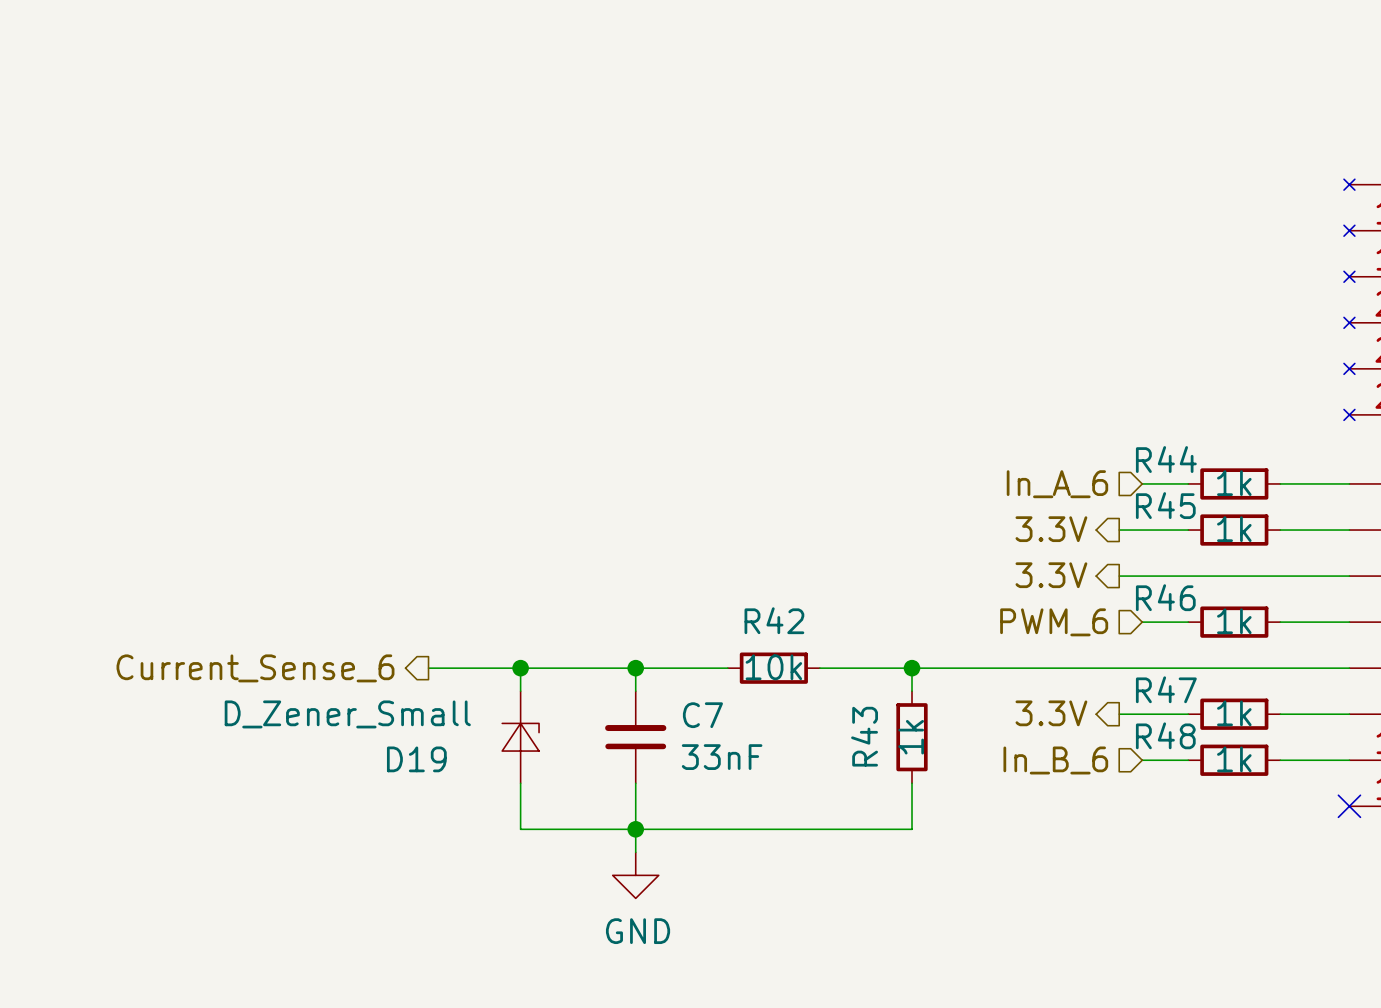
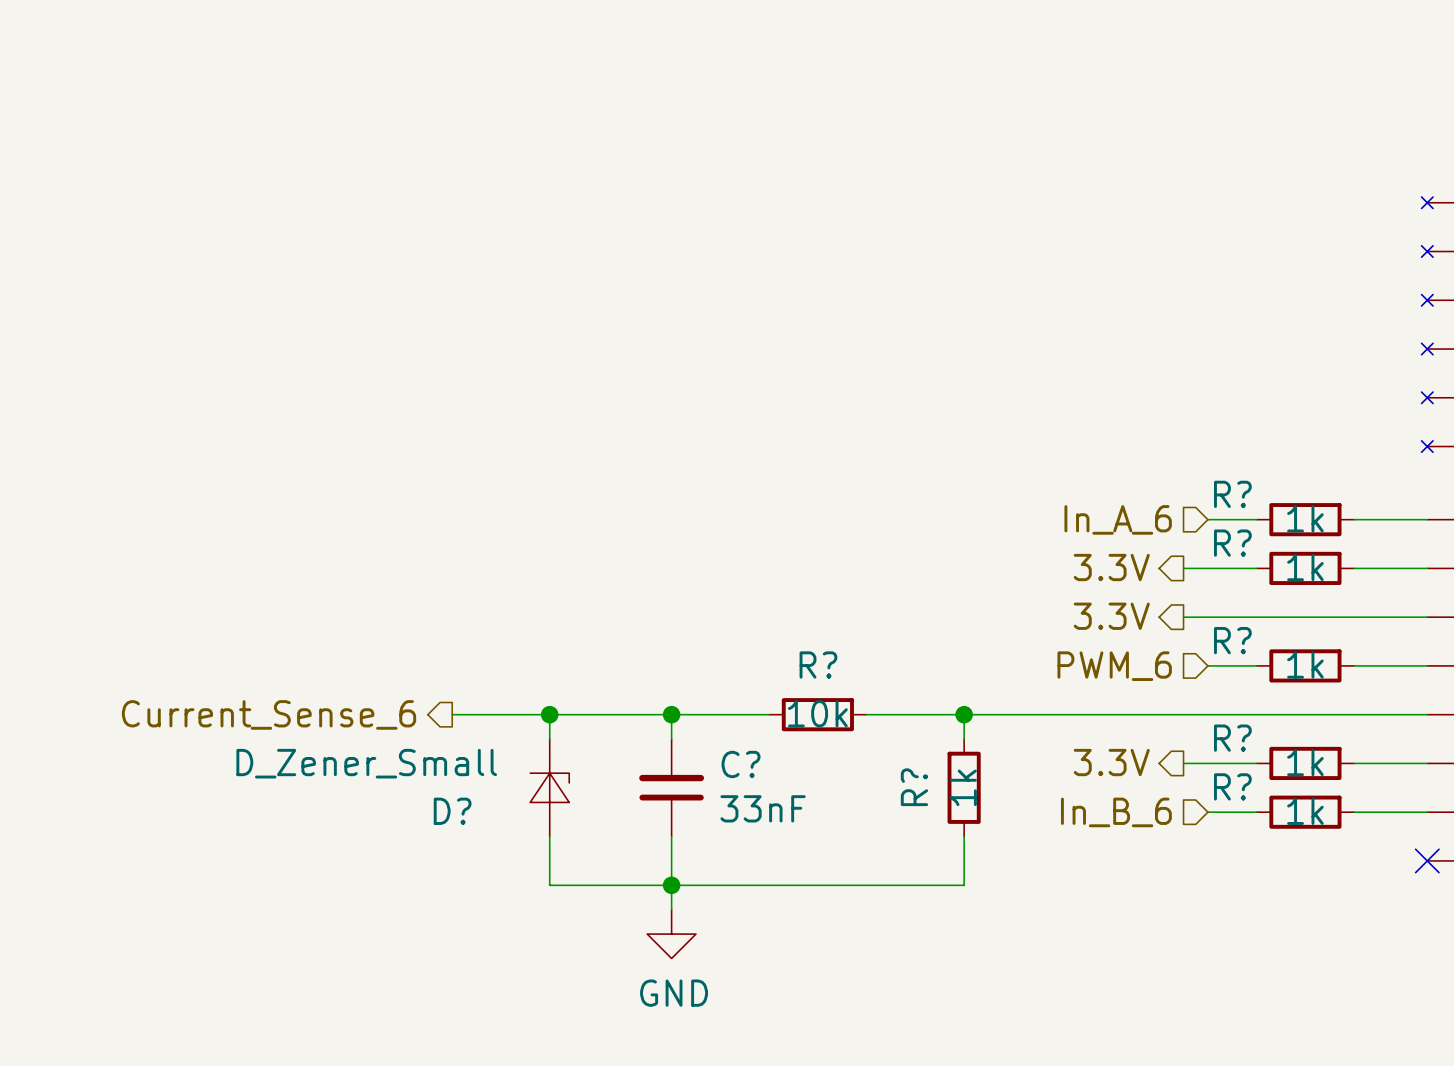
R44 name: R44 (1166, 459) -> R? (1232, 494)
R45 name: R45 (1165, 505) -> R? (1232, 543)
R46 name: R46 (1165, 597) -> R? (1232, 640)
R42 name: R42 (774, 620) -> R? (818, 665)
R47 name: R47 (1166, 689) -> R? (1232, 738)
C7 name: C7 (702, 715) -> C? (741, 764)
R48 name: R48 (1165, 735) -> R? (1232, 786)
R43 name: R43 (864, 736) -> R? (914, 787)
D19 name: D19 (416, 759) -> D? (452, 811)

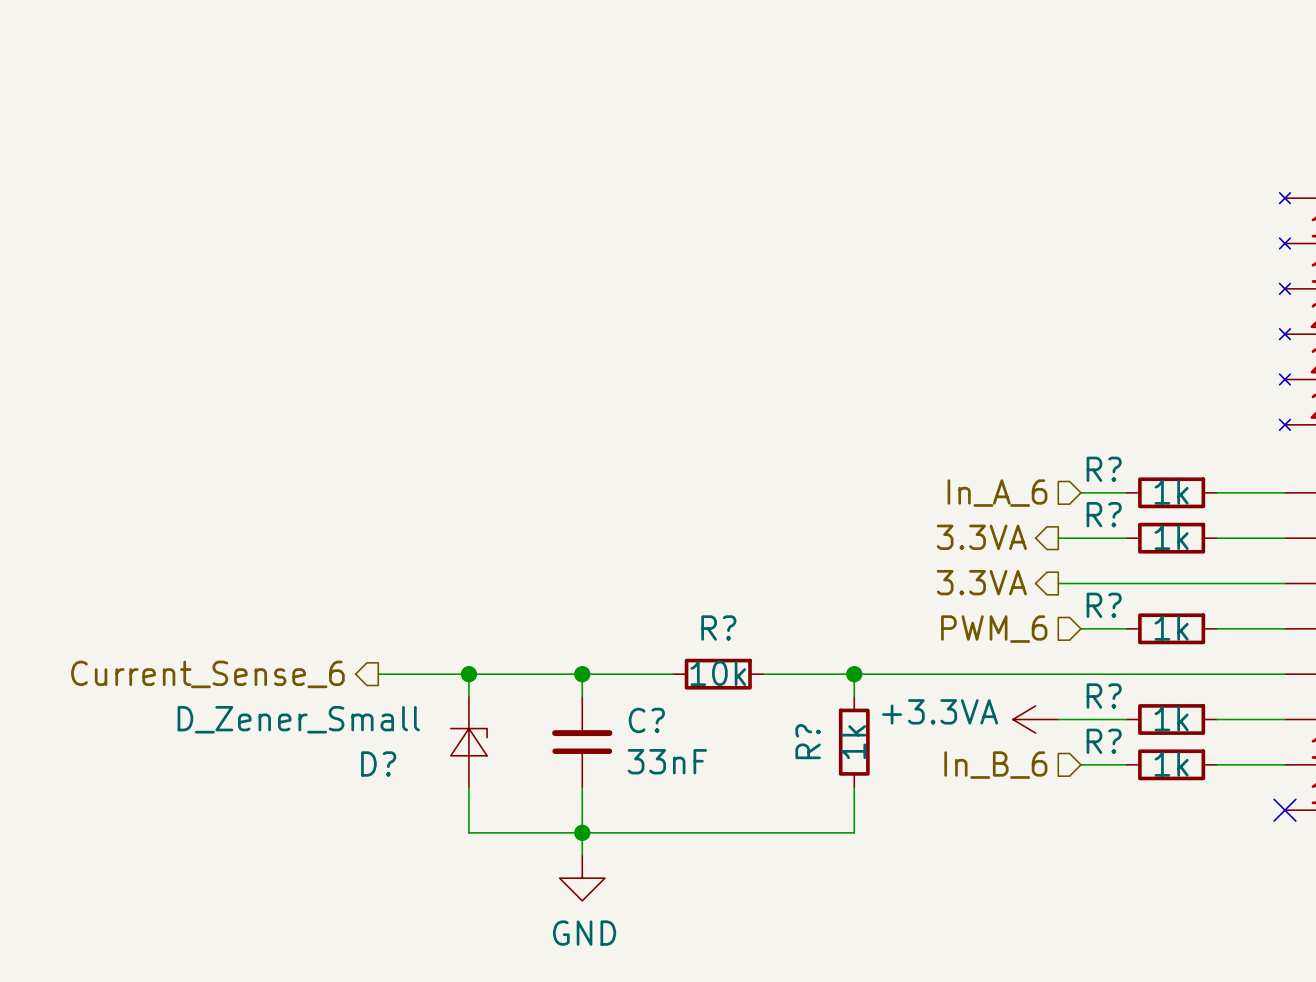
hierarchical label: 3.3V (1111, 567) -> 3.3VA (981, 537)
hierarchical label: 3.3V (1111, 616) -> 3.3VA (981, 582)
hierarchical label: 3.3V (1111, 762) -> none
power symbol: none -> +3.3VA (1035, 719)

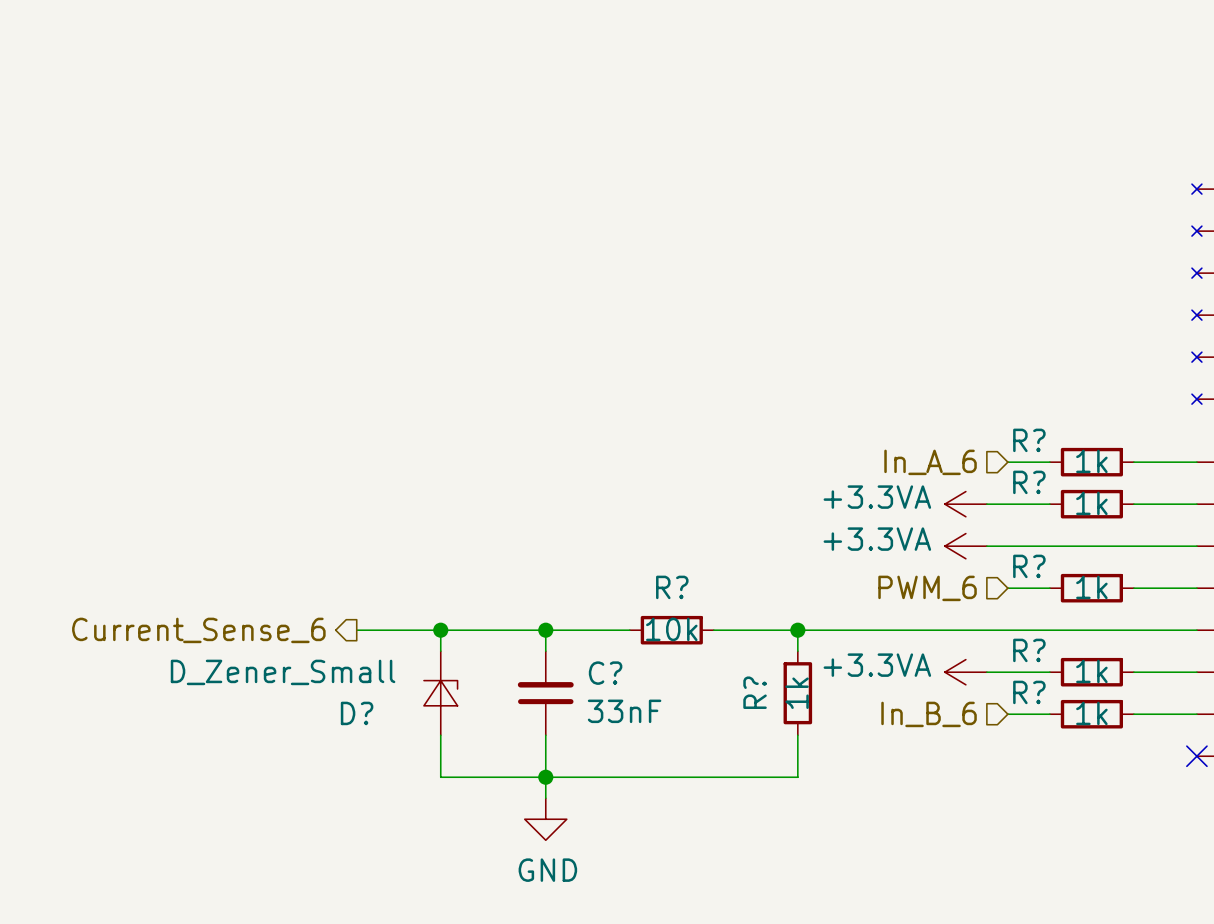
hierarchical label: 3.3VA (981, 537) -> none
power symbol: none -> +3.3VA (965, 504)
hierarchical label: 3.3VA (981, 582) -> none
power symbol: none -> +3.3VA (965, 546)

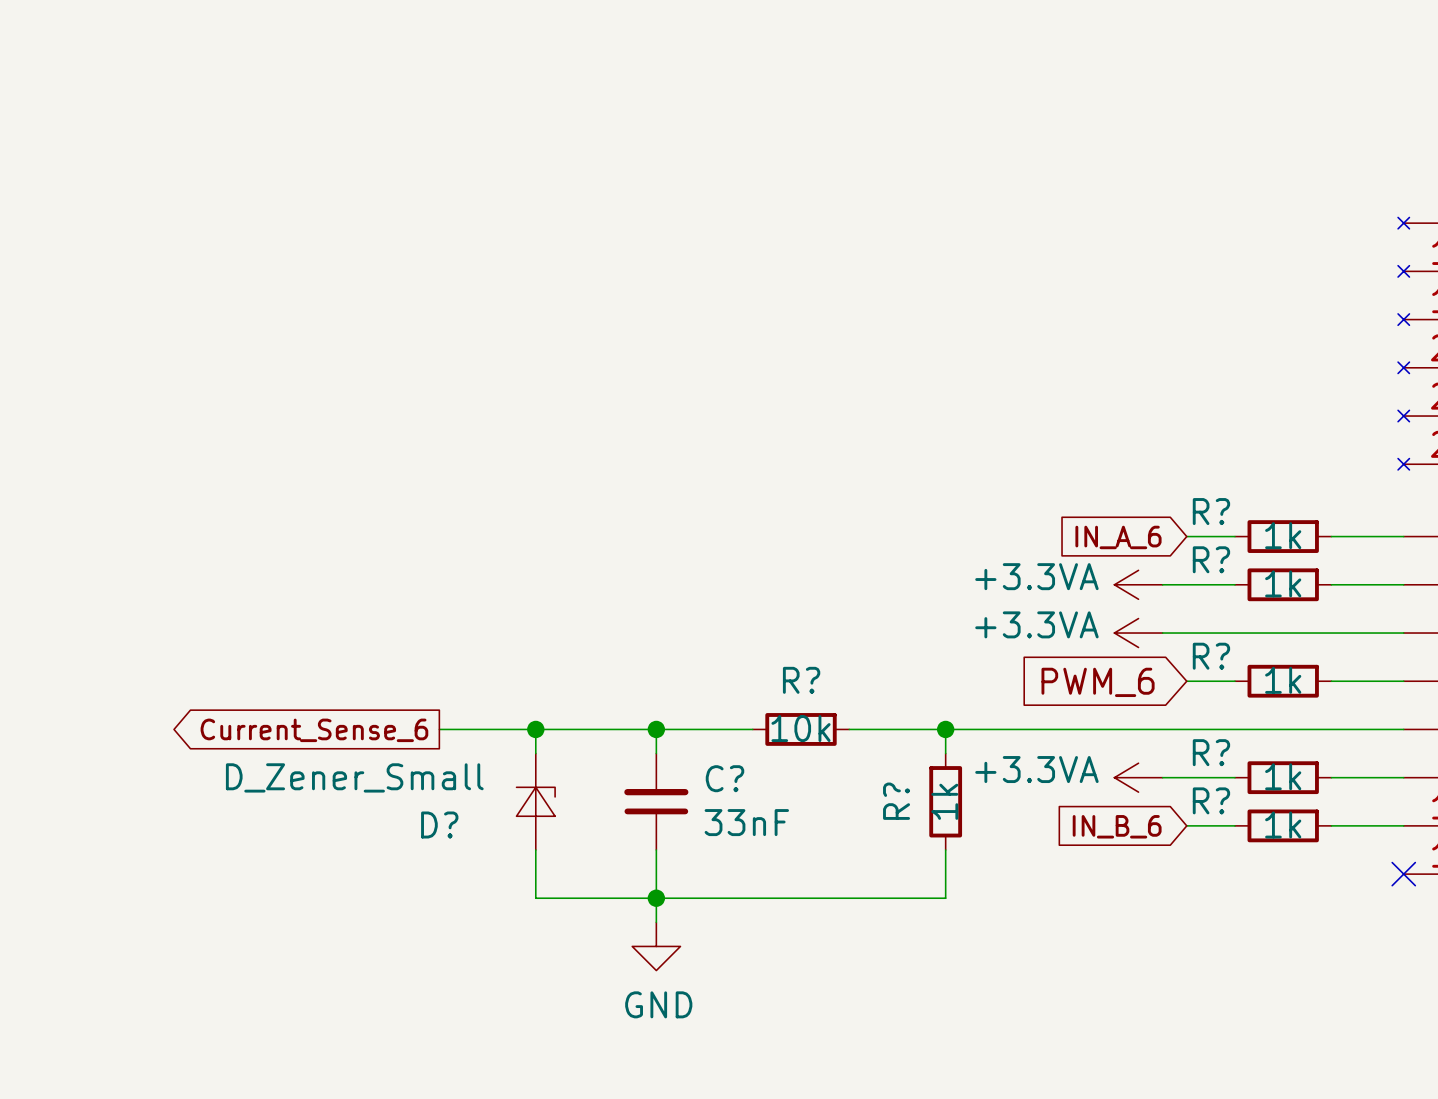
hierarchical label: In_A_6 (930, 462) -> none
global label: none -> IN_A_6 (1118, 537)
hierarchical label: PWM_6 (927, 588) -> none
global label: none -> PWM_6 (1098, 682)
hierarchical label: Current_Sense_6 (198, 630) -> none
global label: none -> Current_Sense_6 (314, 730)
hierarchical label: In_B_6 (929, 714) -> none
global label: none -> IN_B_6 (1117, 826)

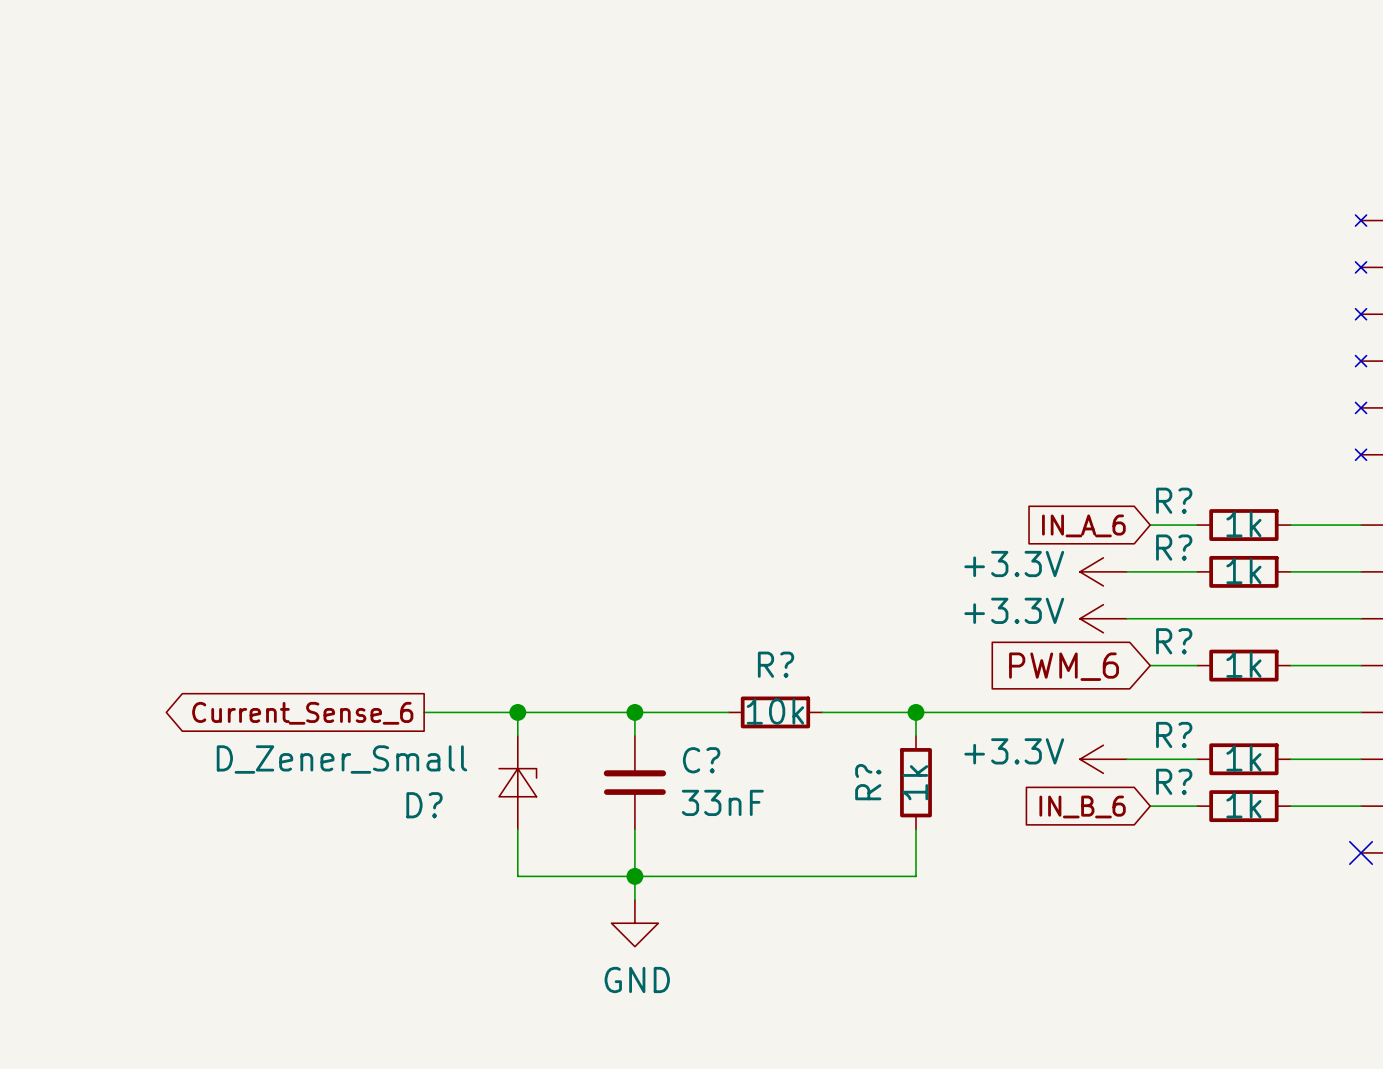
power symbol: +3.3VA (1138, 584) -> +3.3V (1103, 571)
power symbol: +3.3VA (1138, 633) -> +3.3V (1103, 618)
power symbol: +3.3VA (1138, 777) -> +3.3V (1103, 759)

